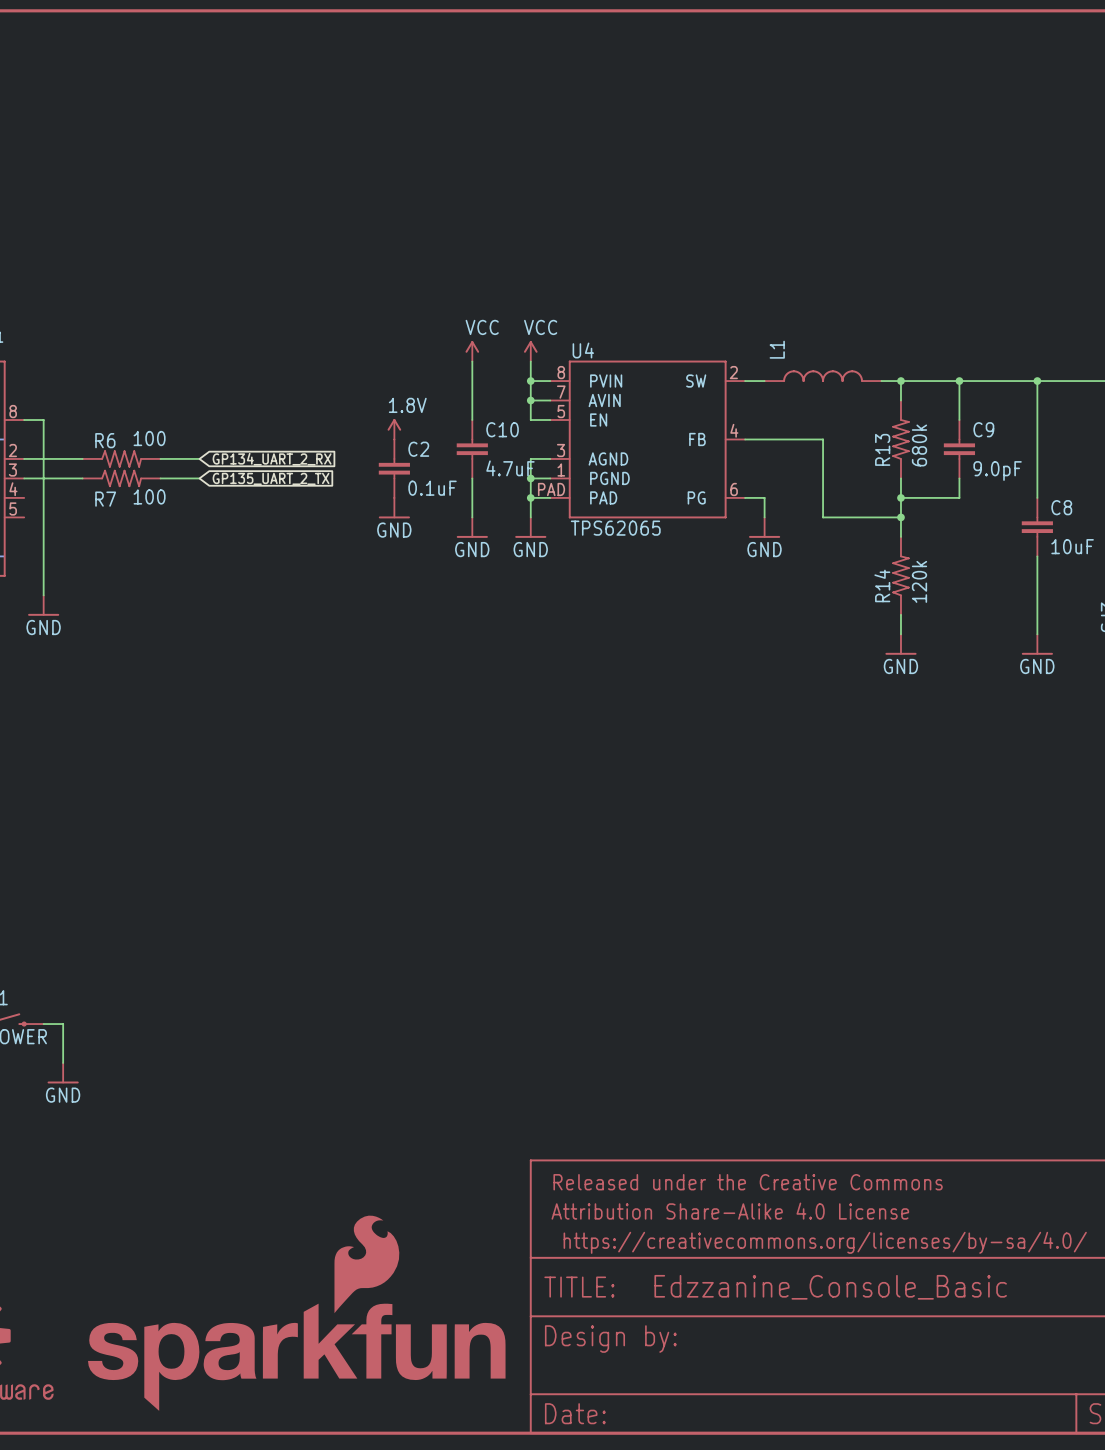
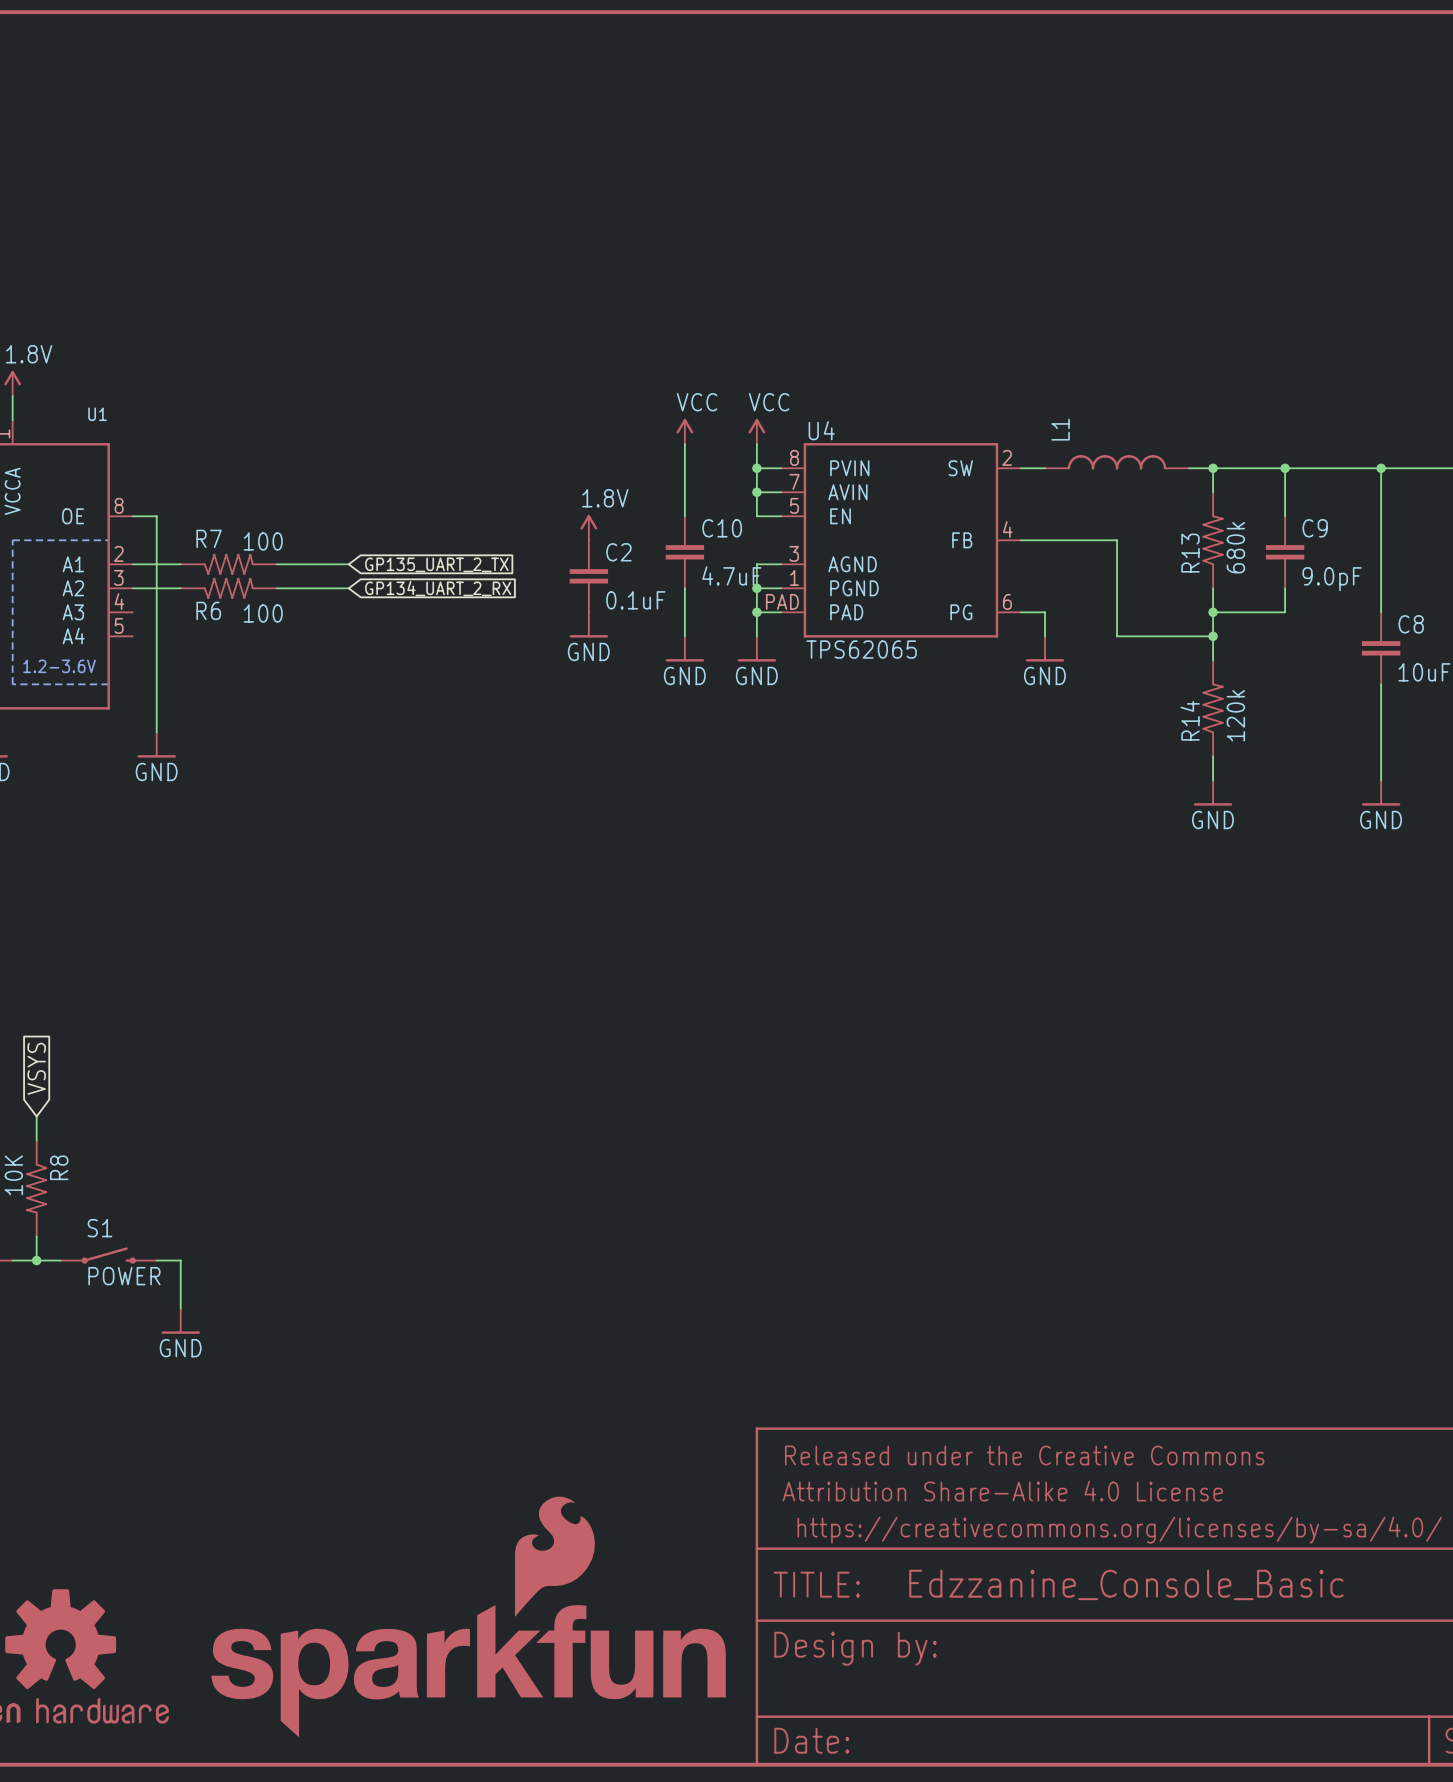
R6 flip: as is (121, 458) -> up-down (228, 588)
global label: GP134_UART_2_RX (272, 459) -> GP135_UART_2_TX (436, 564)
R7 flip: as is (121, 478) -> up-down (228, 564)
global label: GP135_UART_2_TX (271, 478) -> GP134_UART_2_RX (438, 588)

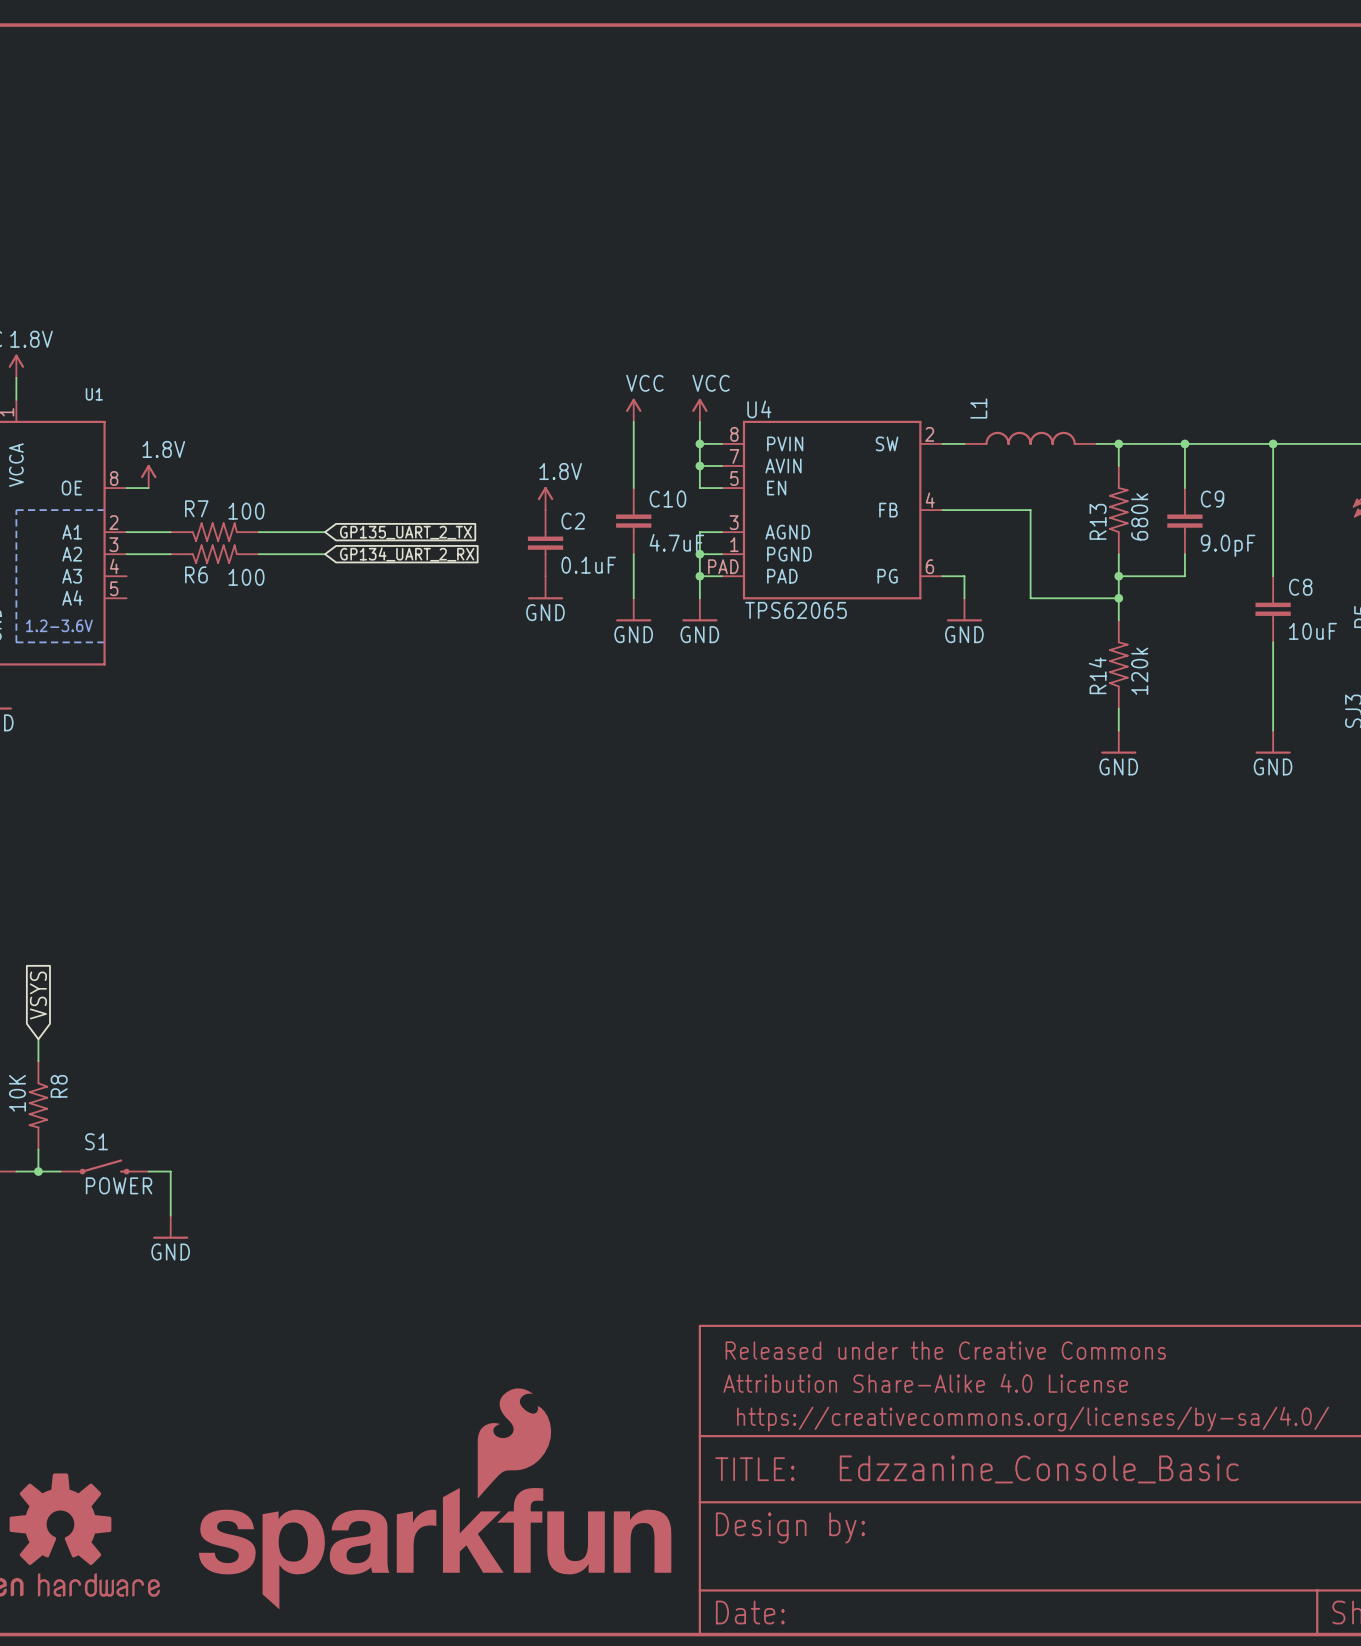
power symbol: none -> 1.8V (148, 476)
wire: (156, 516) (156, 732) -> none
power symbol: GND (156, 744) -> none

